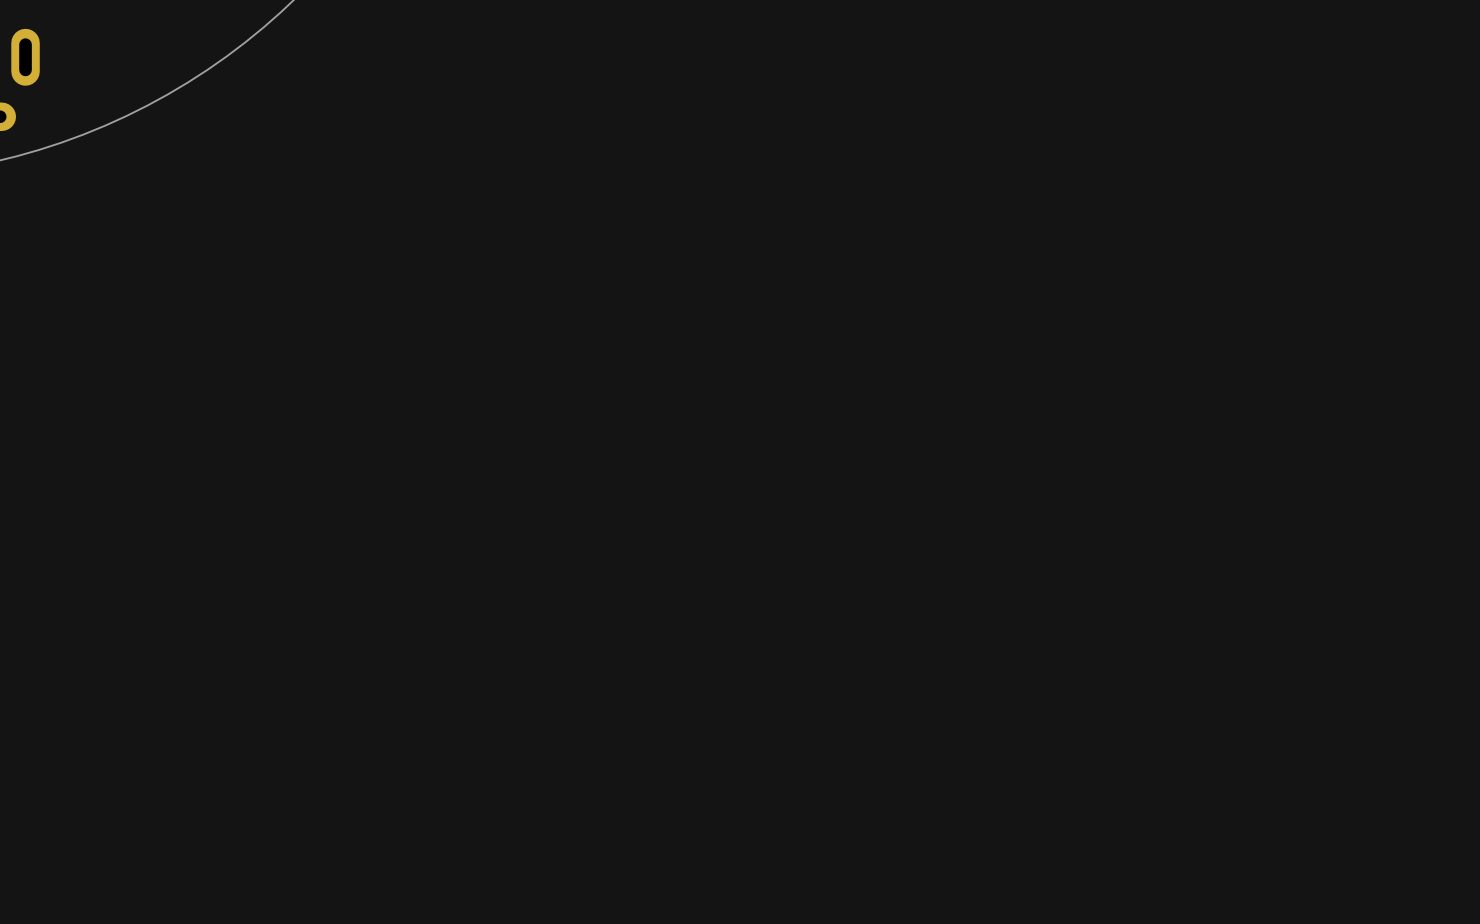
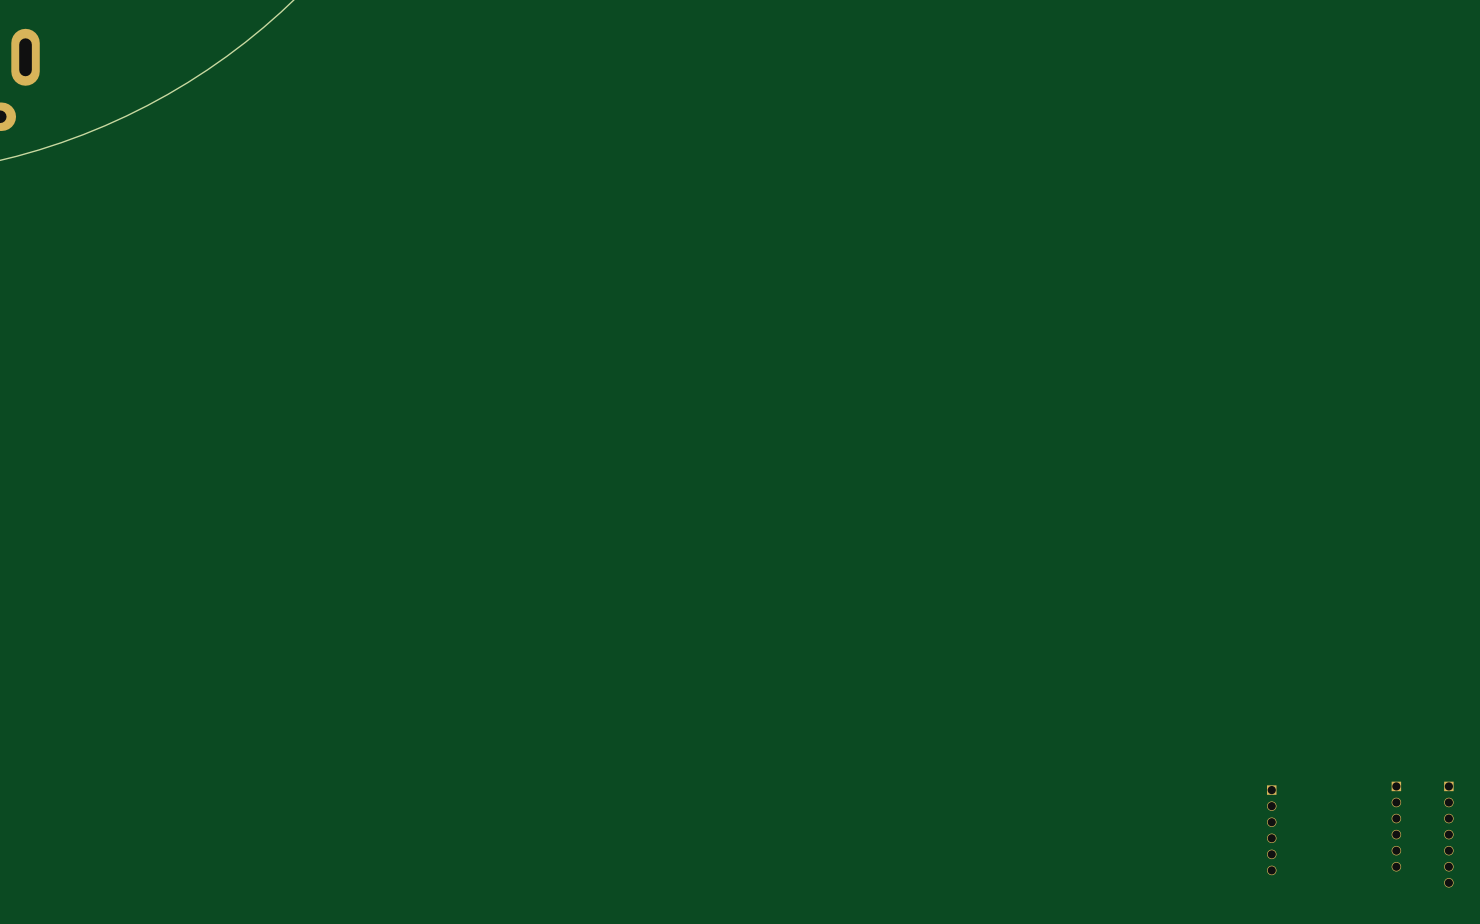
part: none -> (1396, 826)
part: none -> (1271, 830)
part: none -> (1448, 834)

